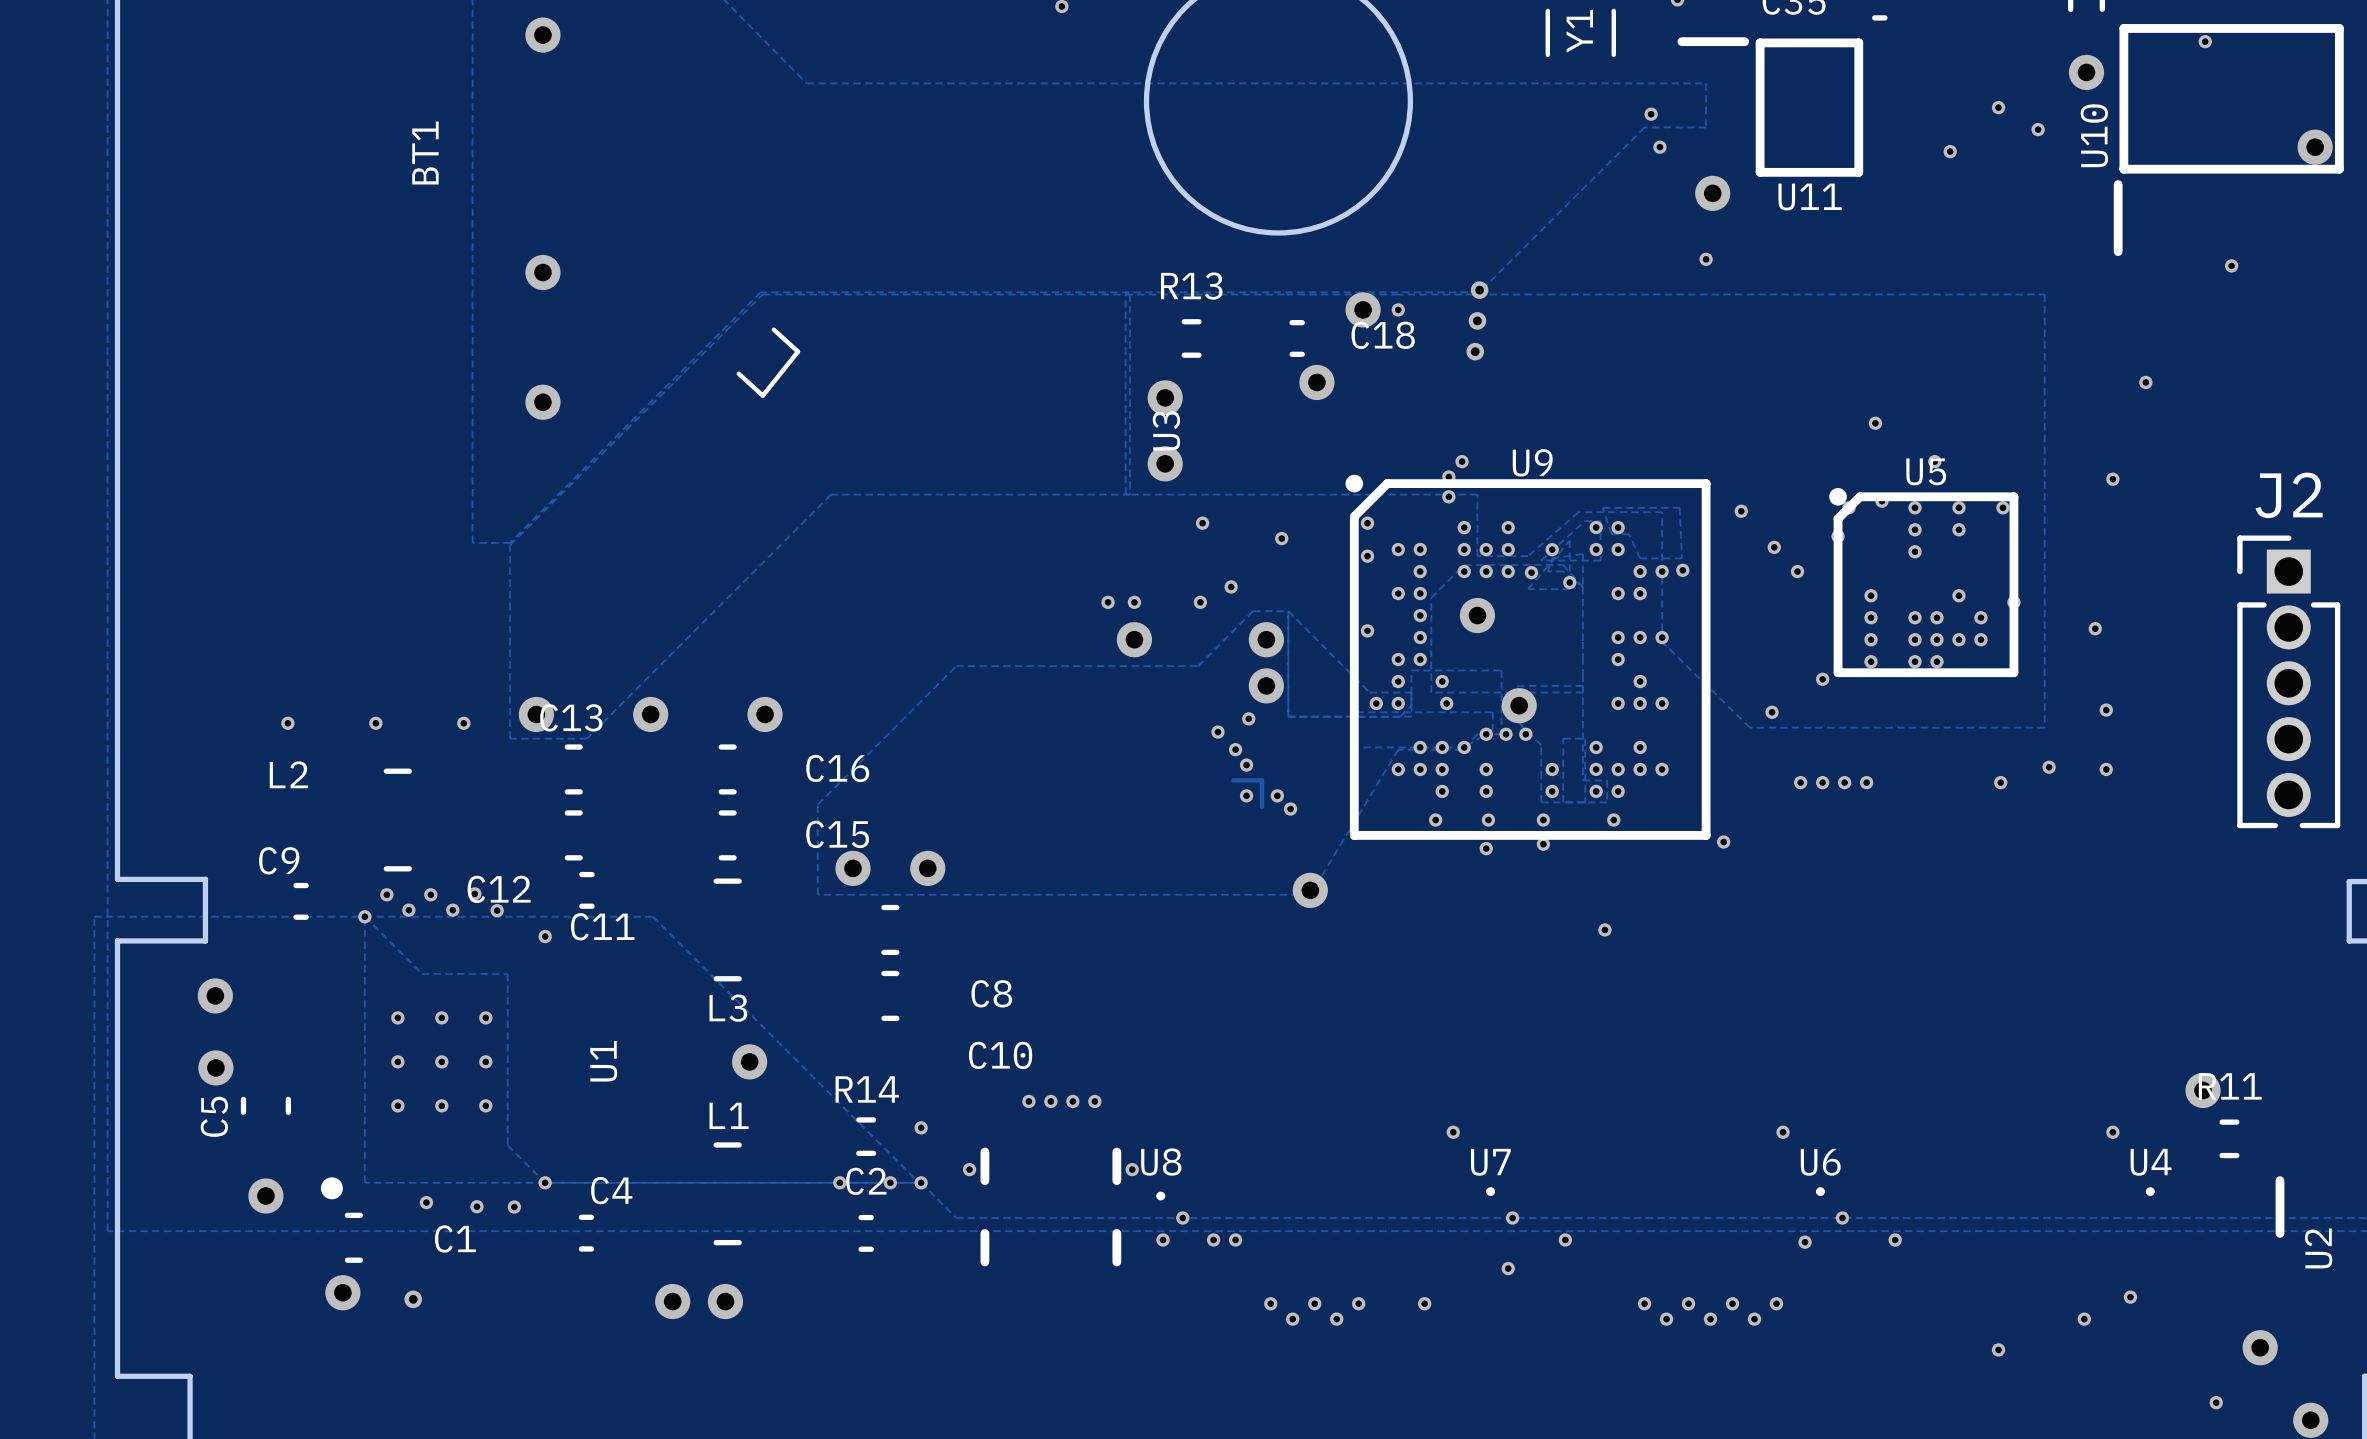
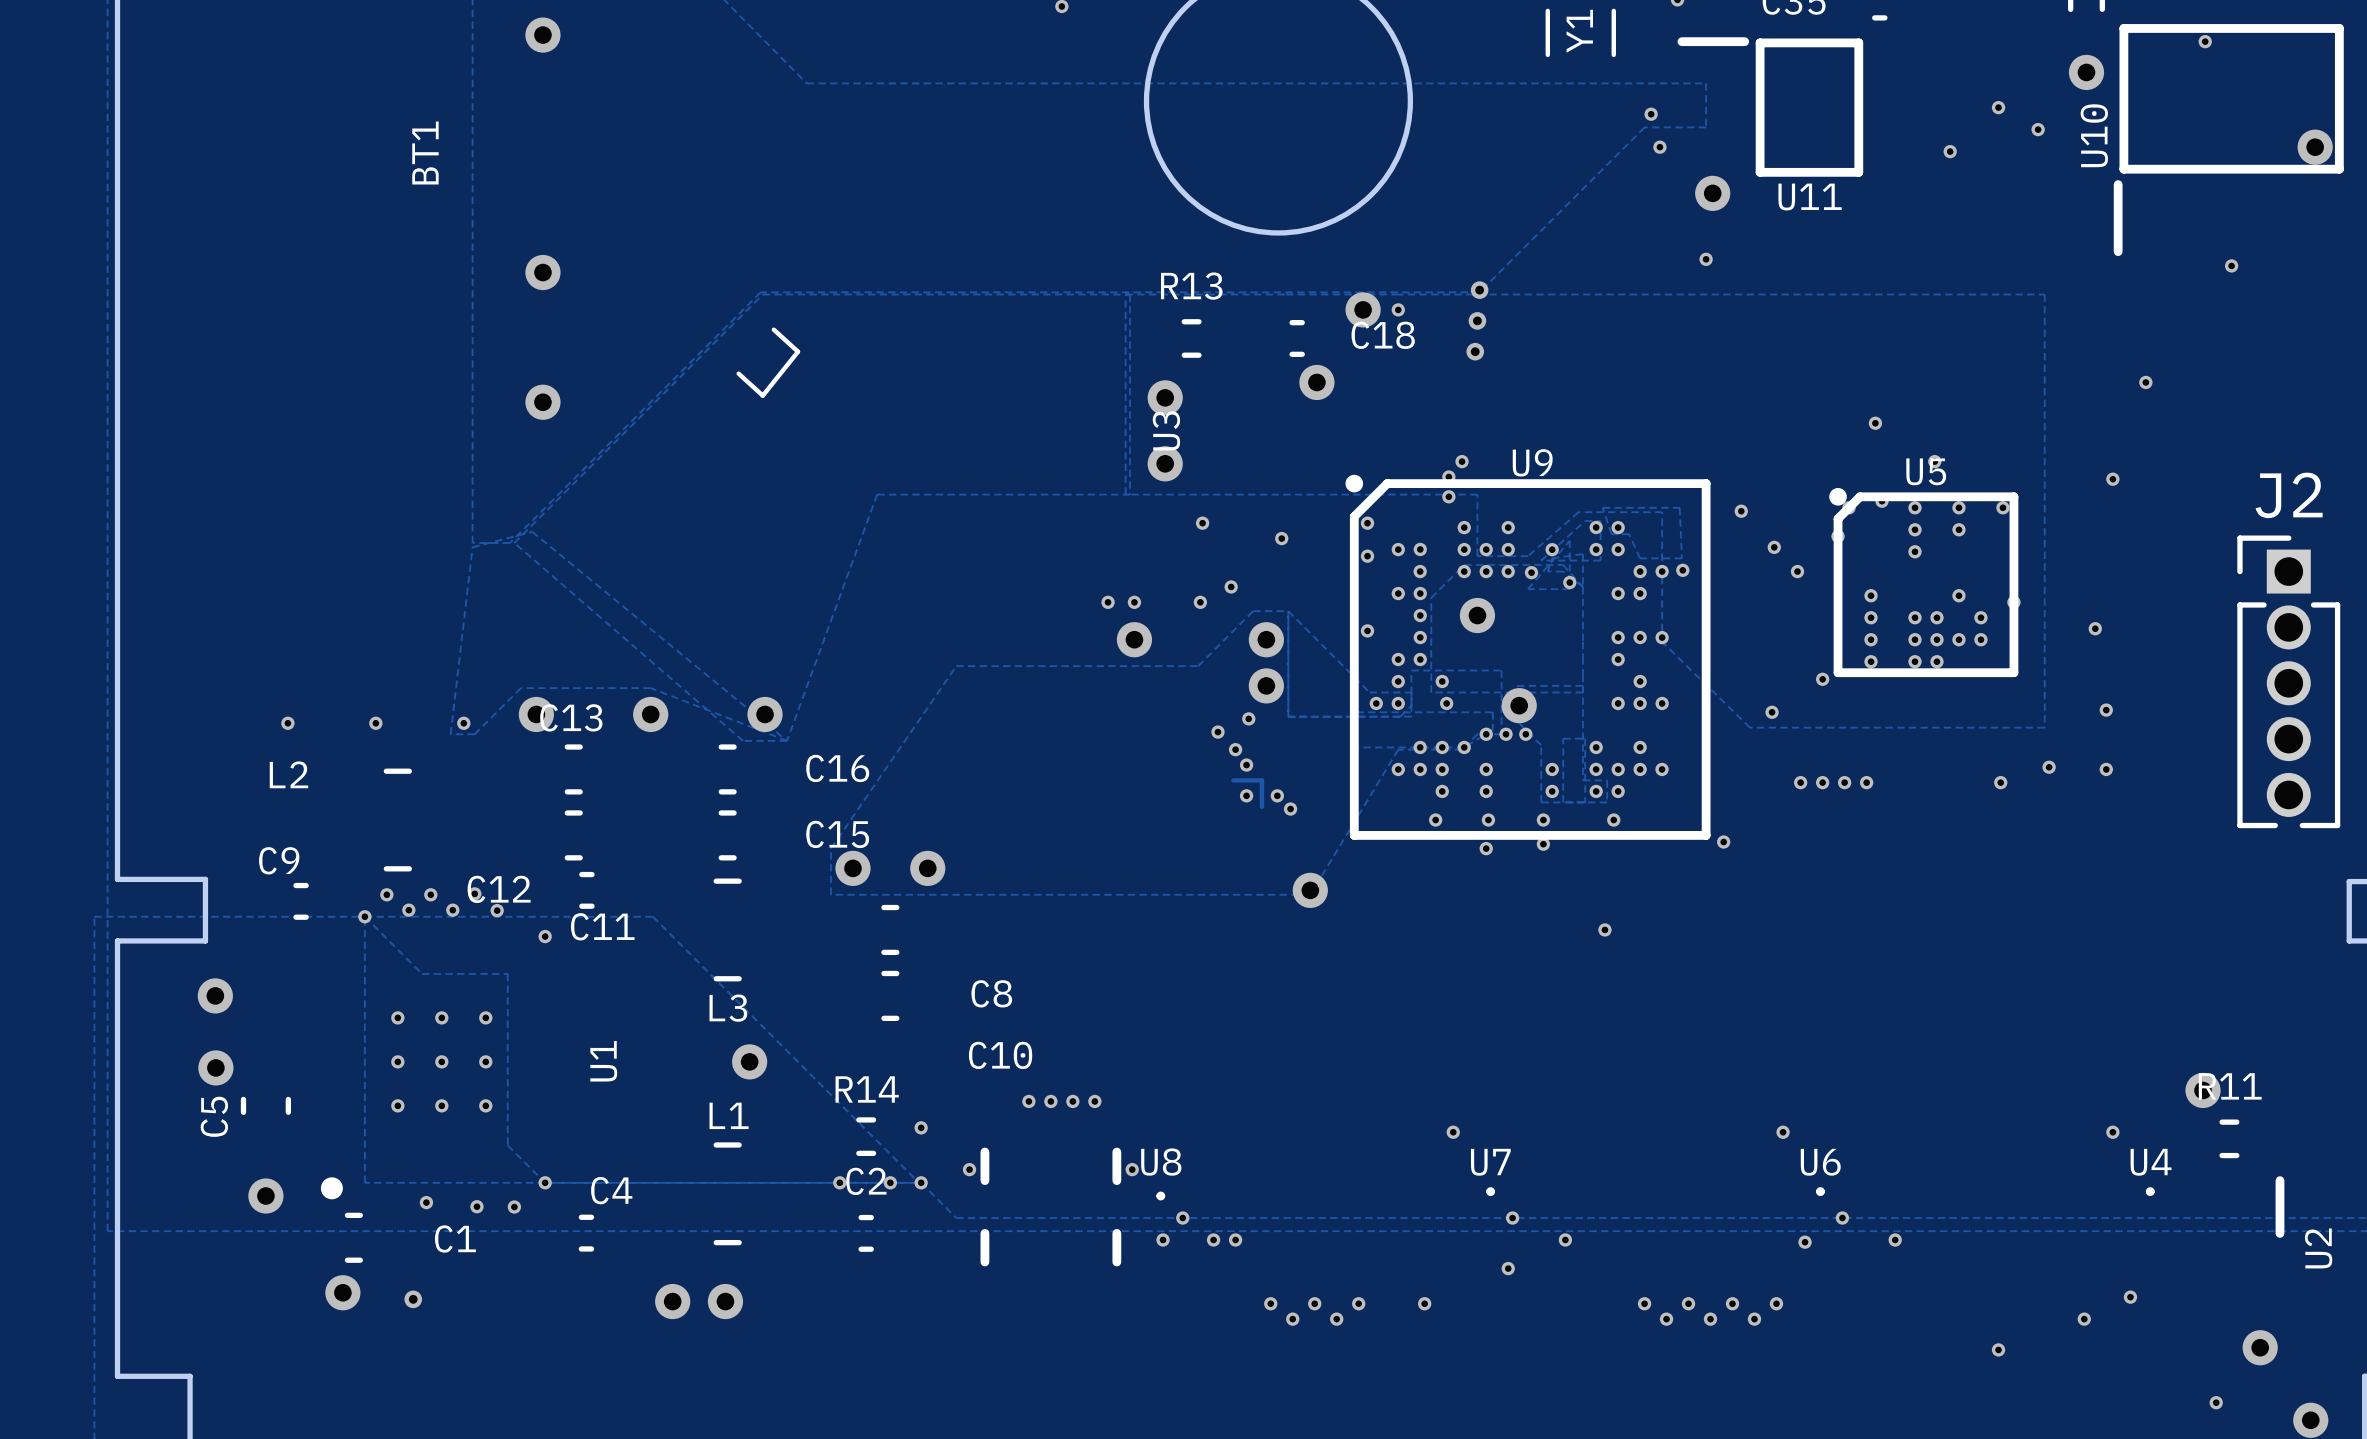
zone outline: (762, 294) (509, 545) (509, 738) (586, 738) (831, 494) (877, 494) -> (762, 294) (514, 542) (743, 740) (787, 740)
zone outline: none -> (877, 494) (787, 740)
zone outline: (956, 666) (817, 804) (817, 894) (831, 894) -> (956, 666) (831, 848) (831, 894)
zone outline: none -> (787, 740) (650, 688) (520, 688) (474, 734) (450, 734) (472, 547) (532, 531) (787, 740)

